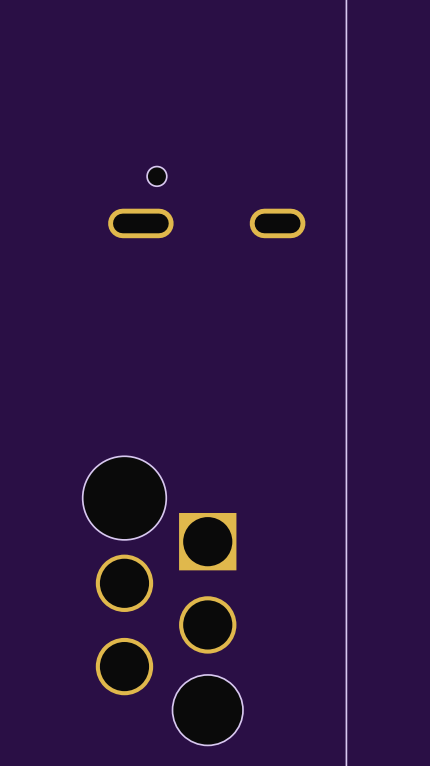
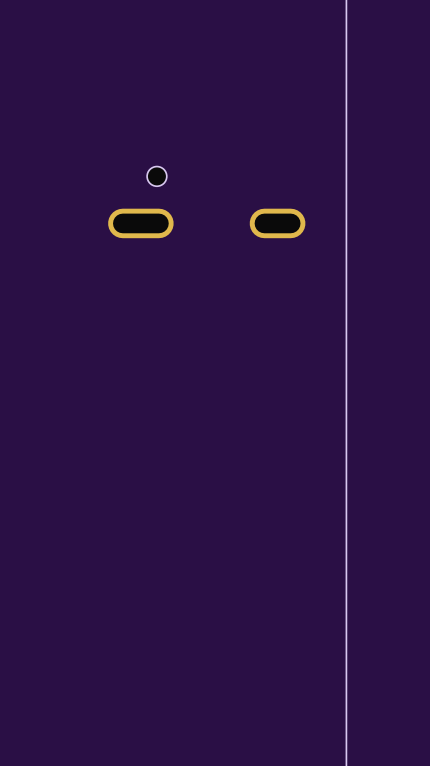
part: (162, 600) -> none

